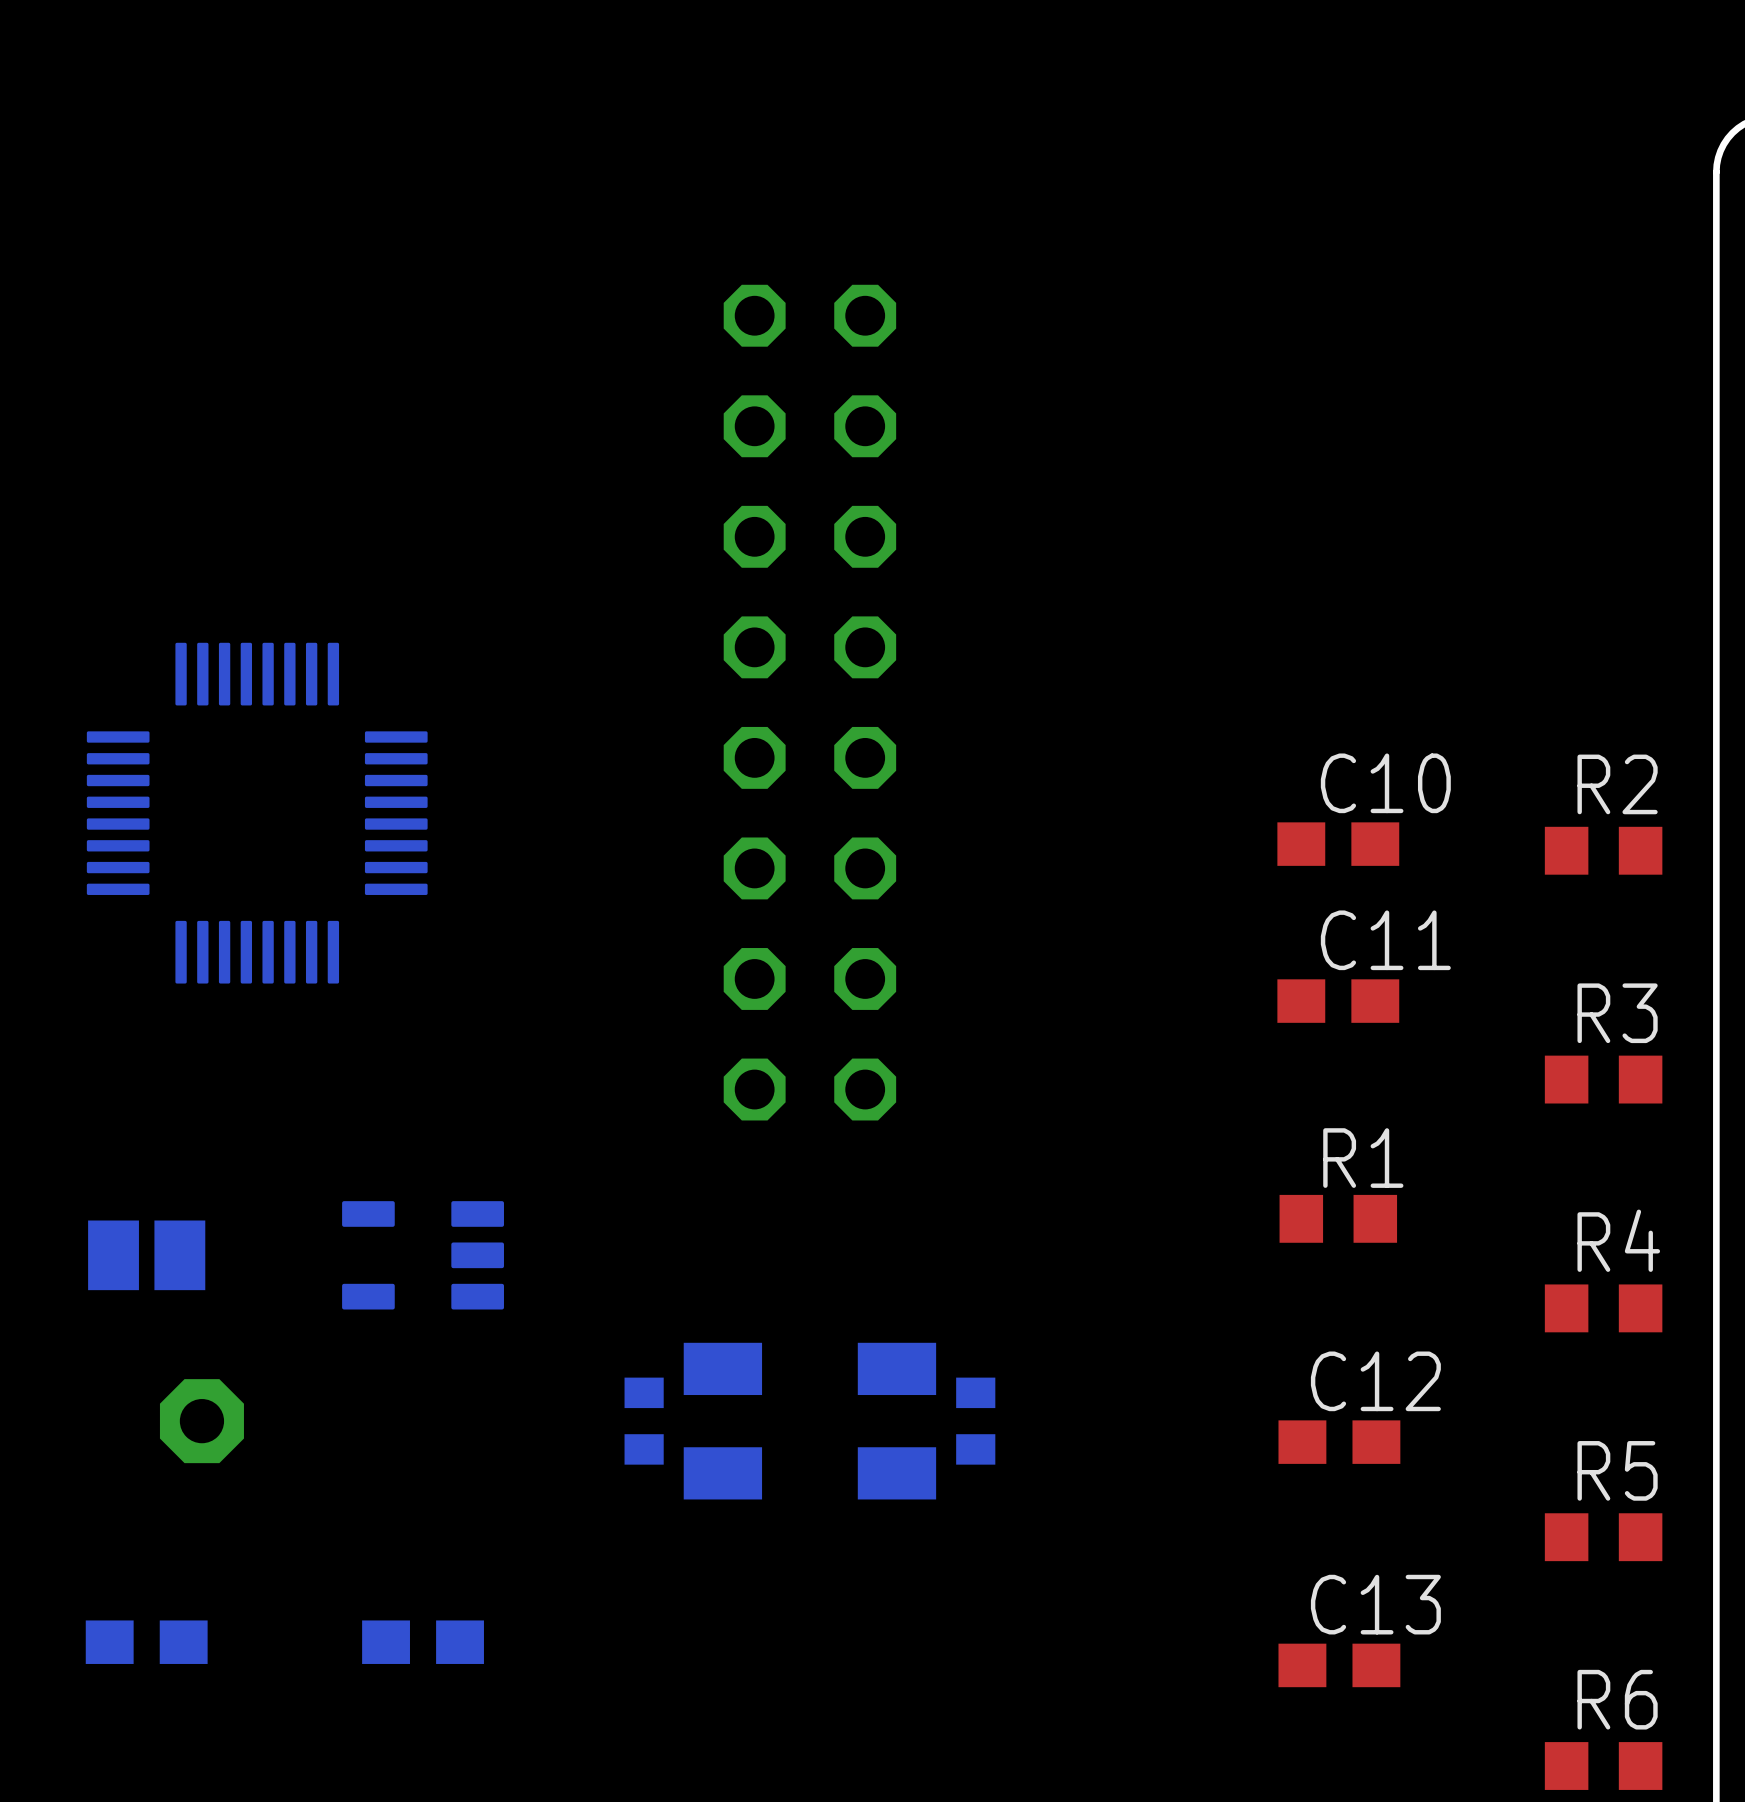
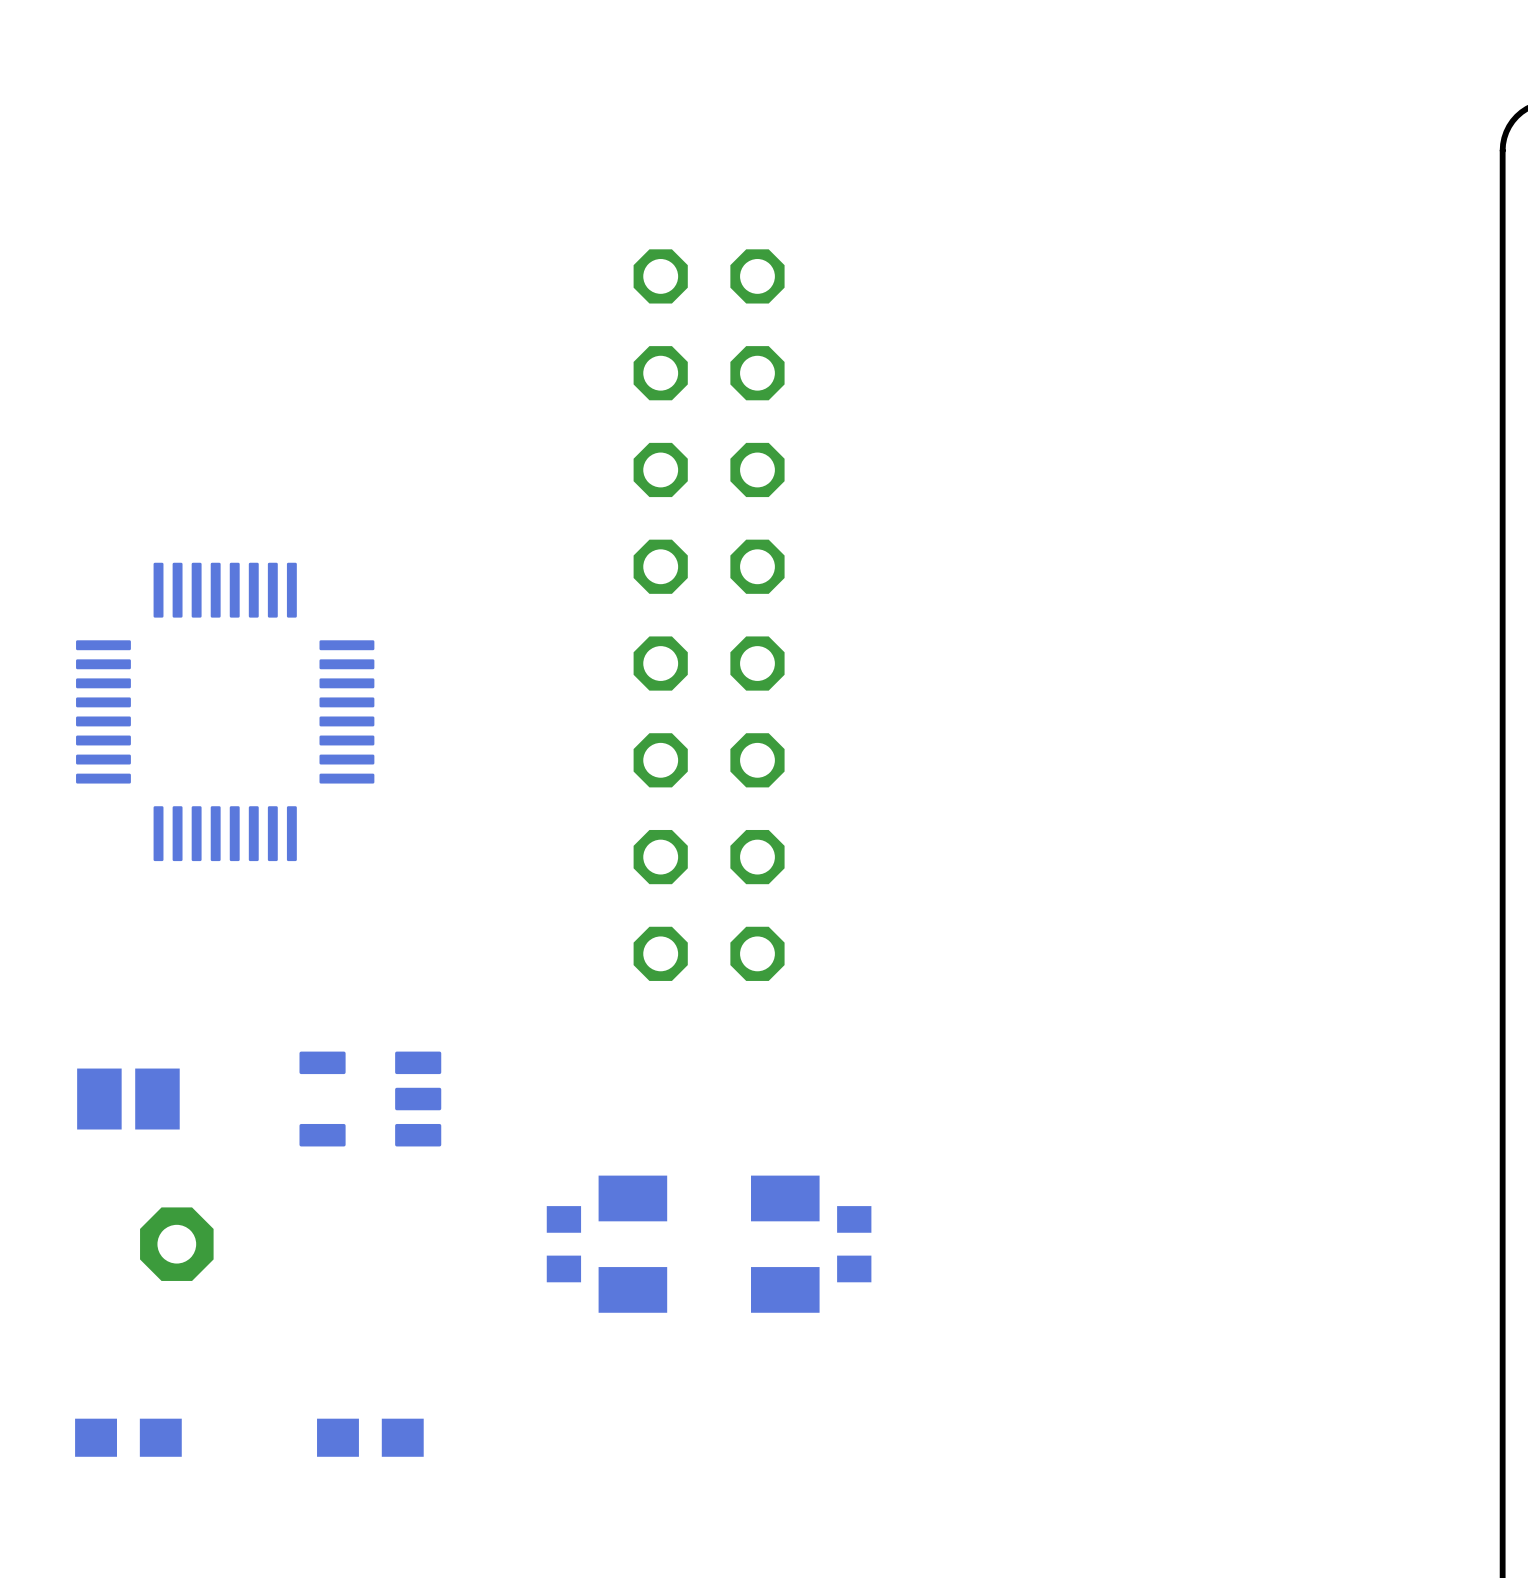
C10: (1338, 844) -> none
R2: (1603, 850) -> none
C11: (1338, 1001) -> none
R3: (1603, 1079) -> none
R1: (1338, 1218) -> none
R4: (1603, 1308) -> none
C12: (1339, 1442) -> none
R5: (1603, 1537) -> none
C13: (1339, 1665) -> none
R6: (1603, 1766) -> none

